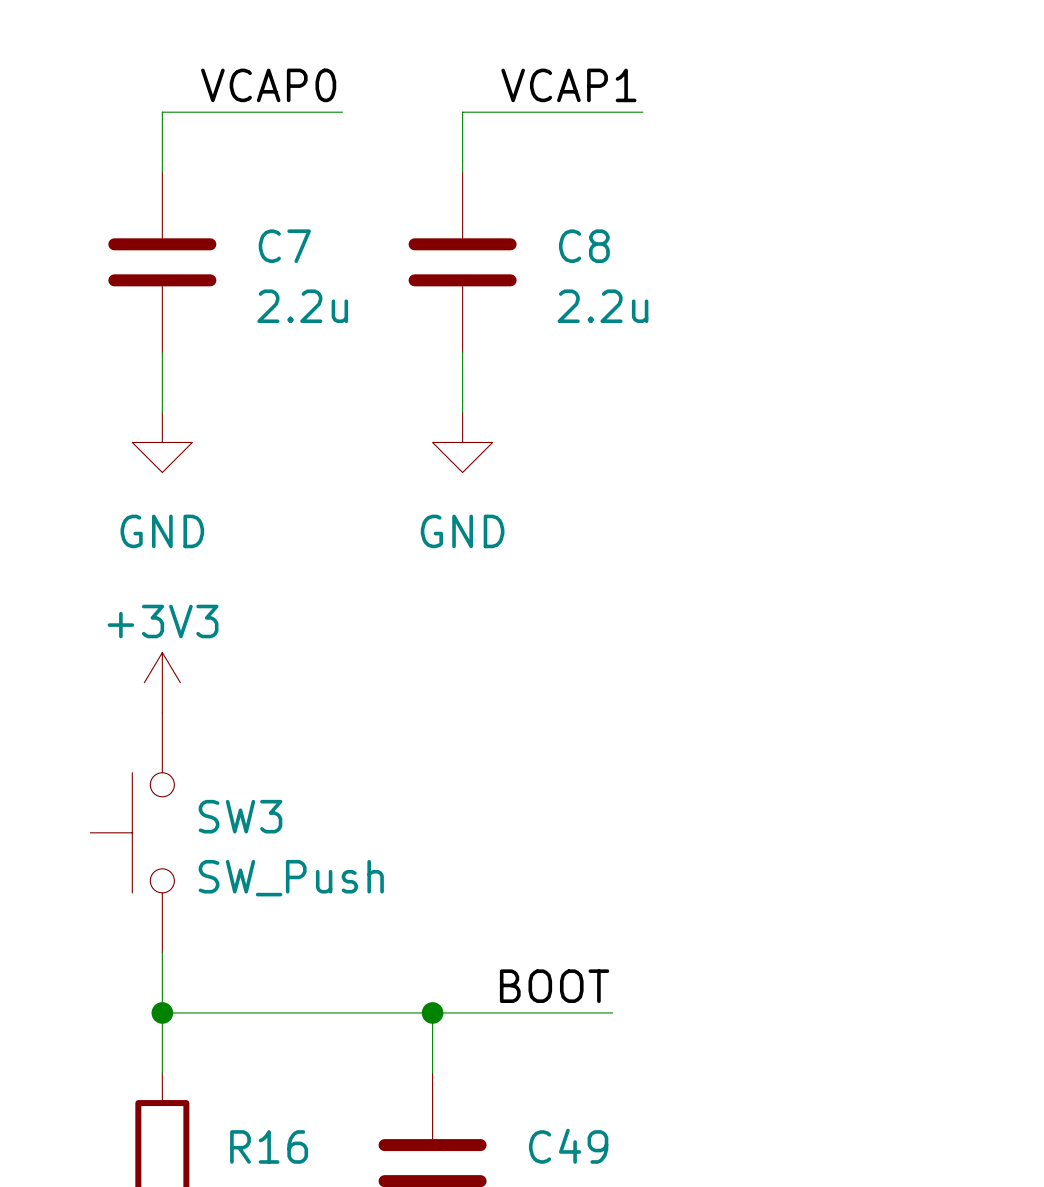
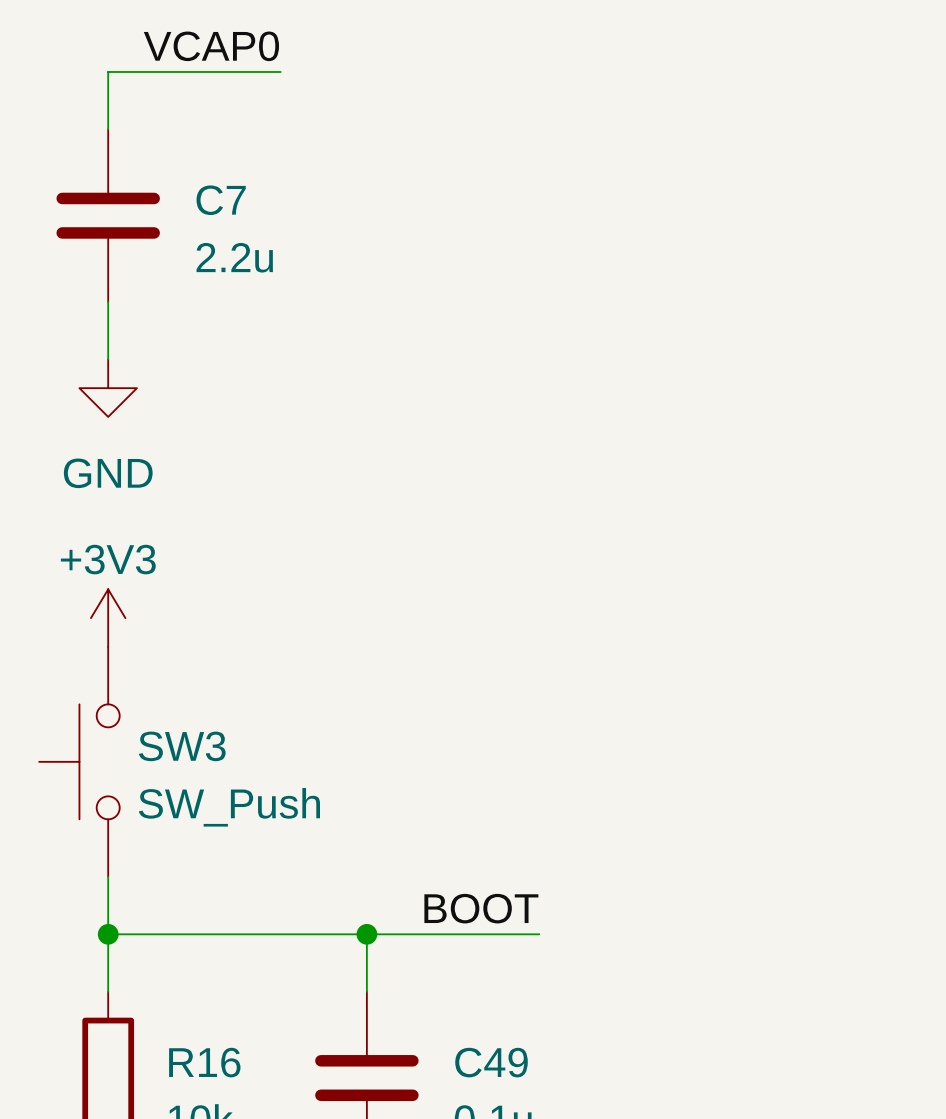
label: VCAP1 (568, 85) -> none
wire: (642, 112) (462, 112) (462, 172) -> none
C8: 2.2u (462, 262) -> none
wire: (462, 352) (462, 412) -> none
power symbol: GND (462, 442) -> none

